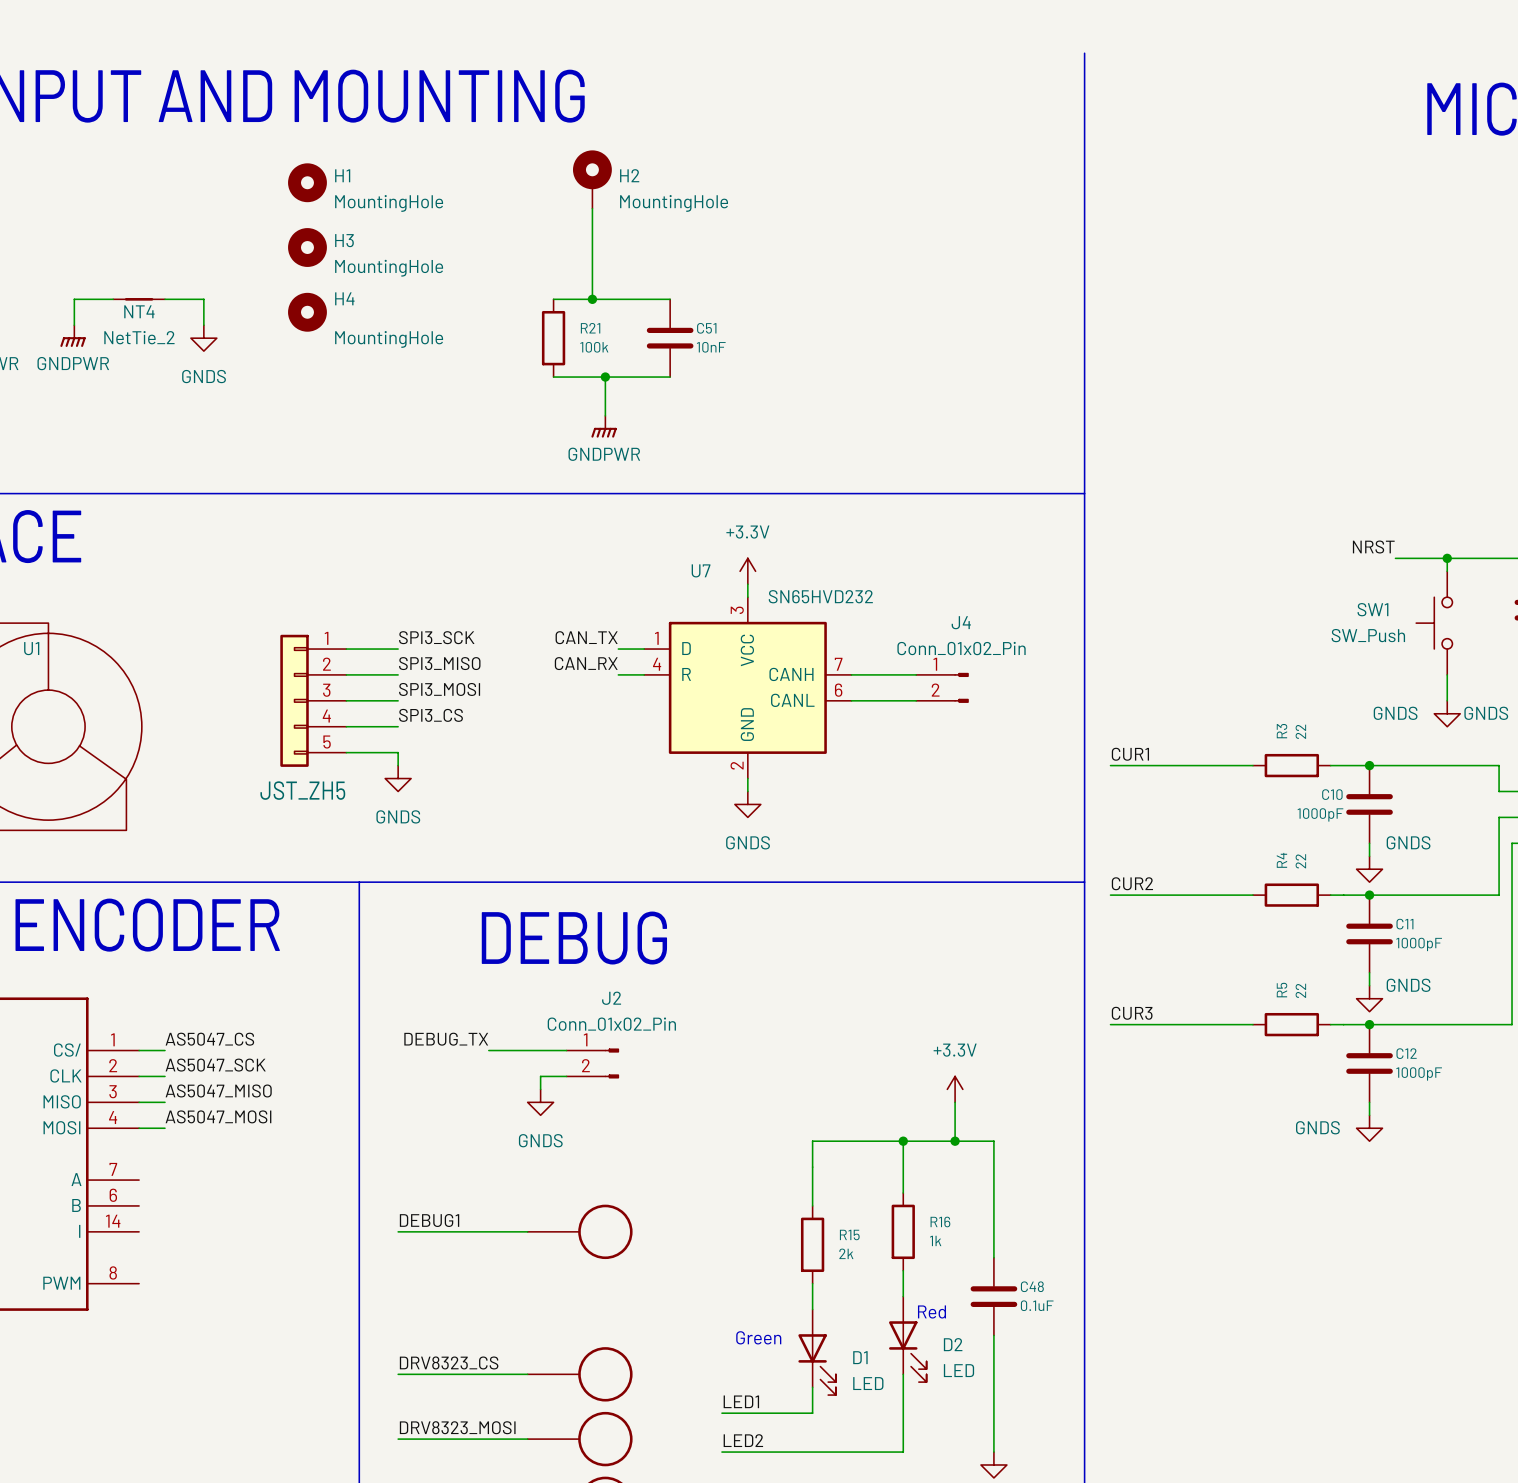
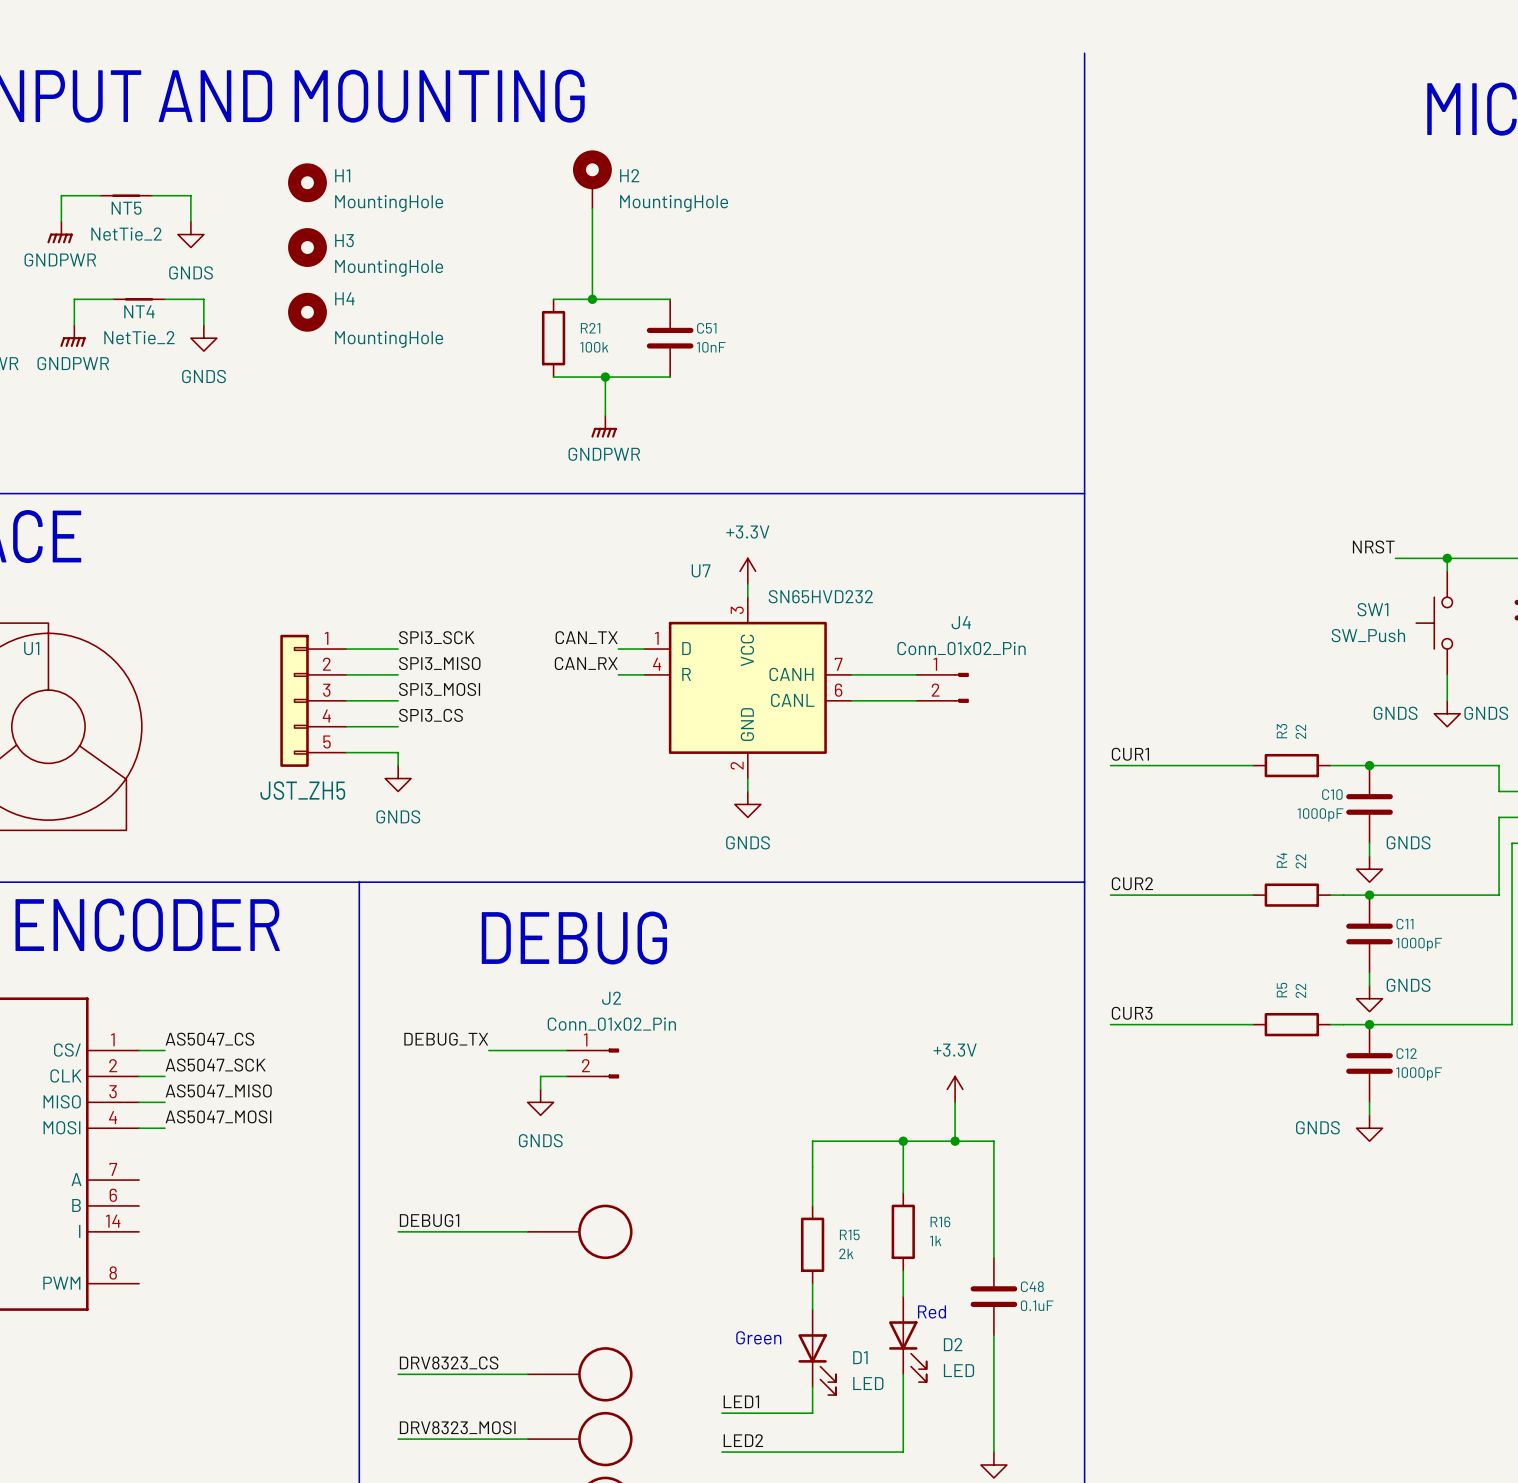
wire: none -> (100, 195) (61, 195) (61, 221)
NT5: none -> NetTie_2 (126, 195)
wire: none -> (152, 195) (190, 195) (190, 221)
power symbol: none -> GNDPWR (60, 232)
power symbol: none -> GNDS (190, 234)

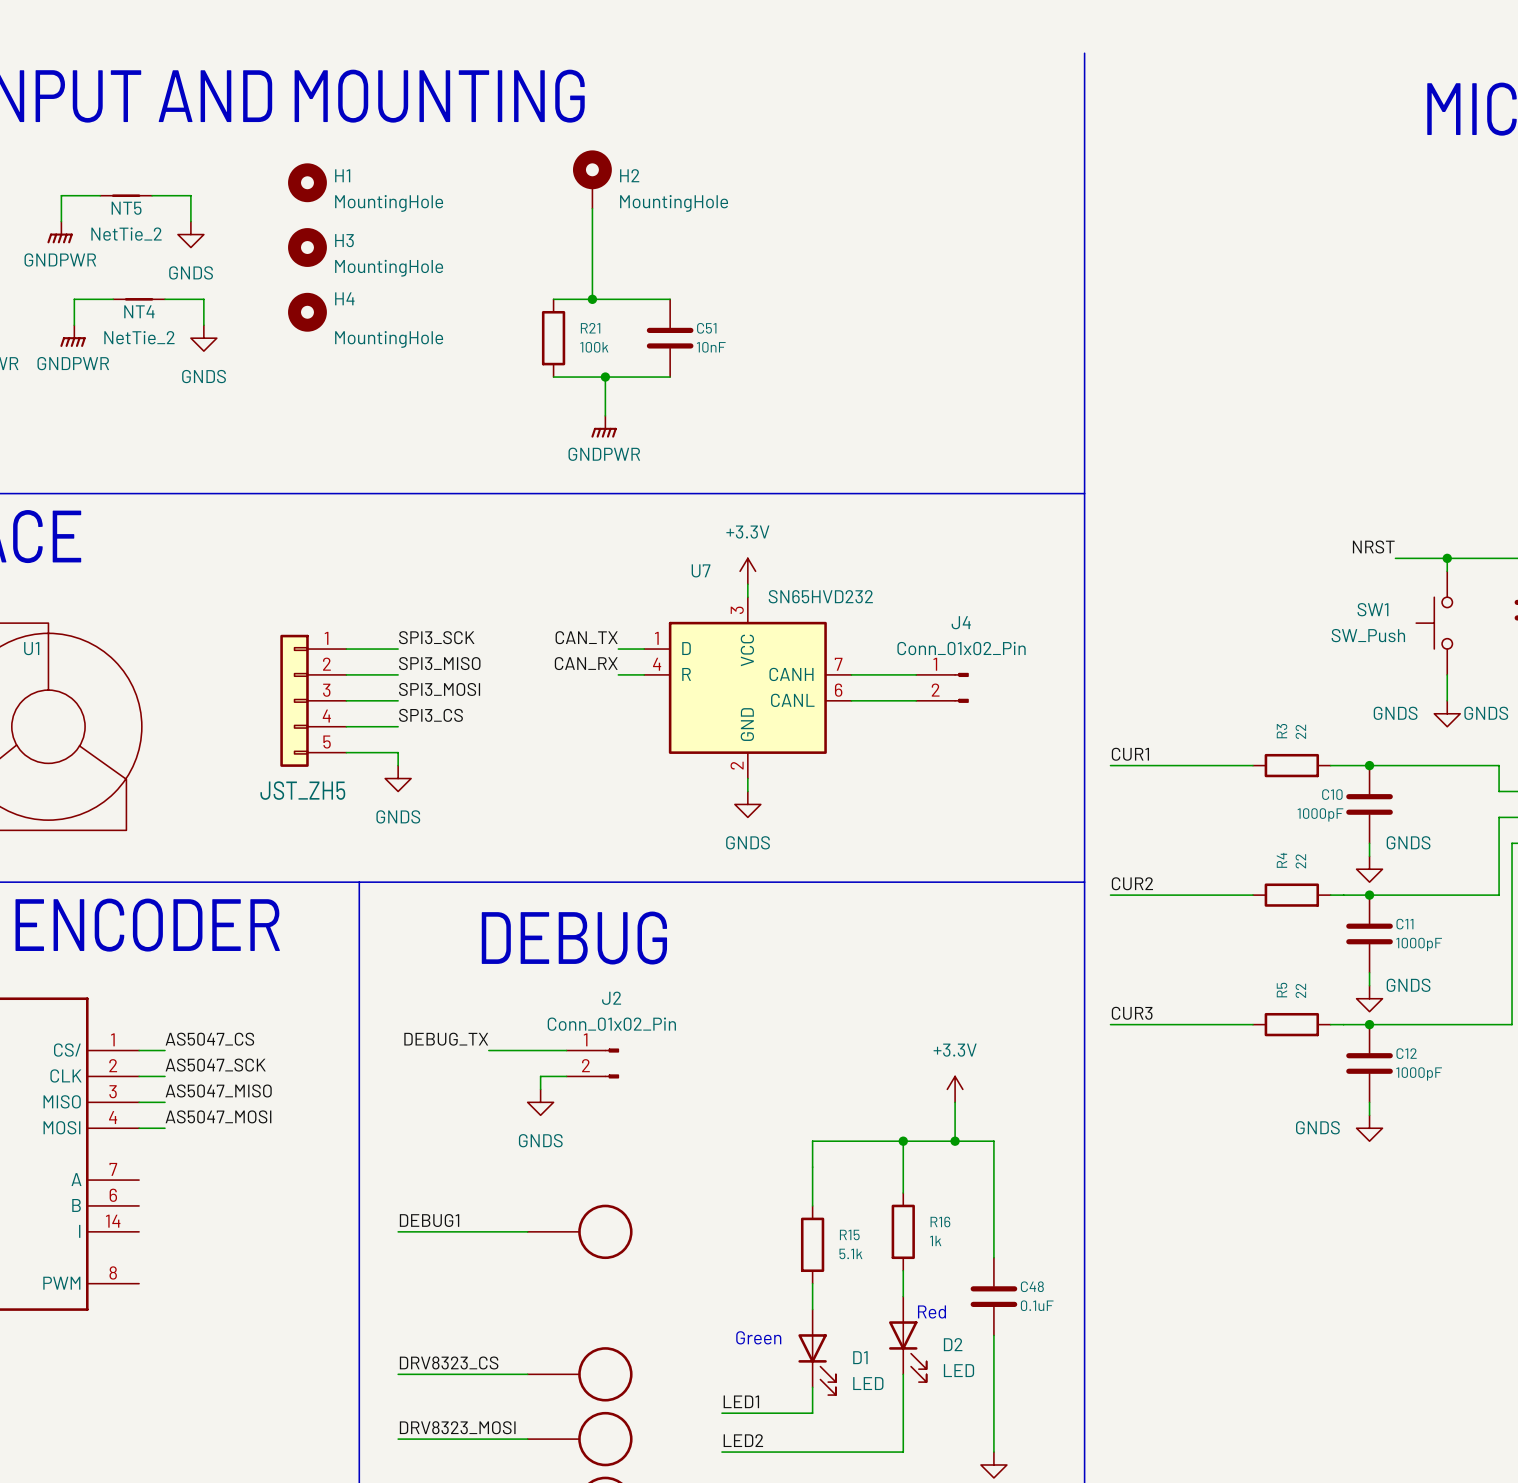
R15 value: 2k (846, 1253) -> 5.1k (850, 1253)

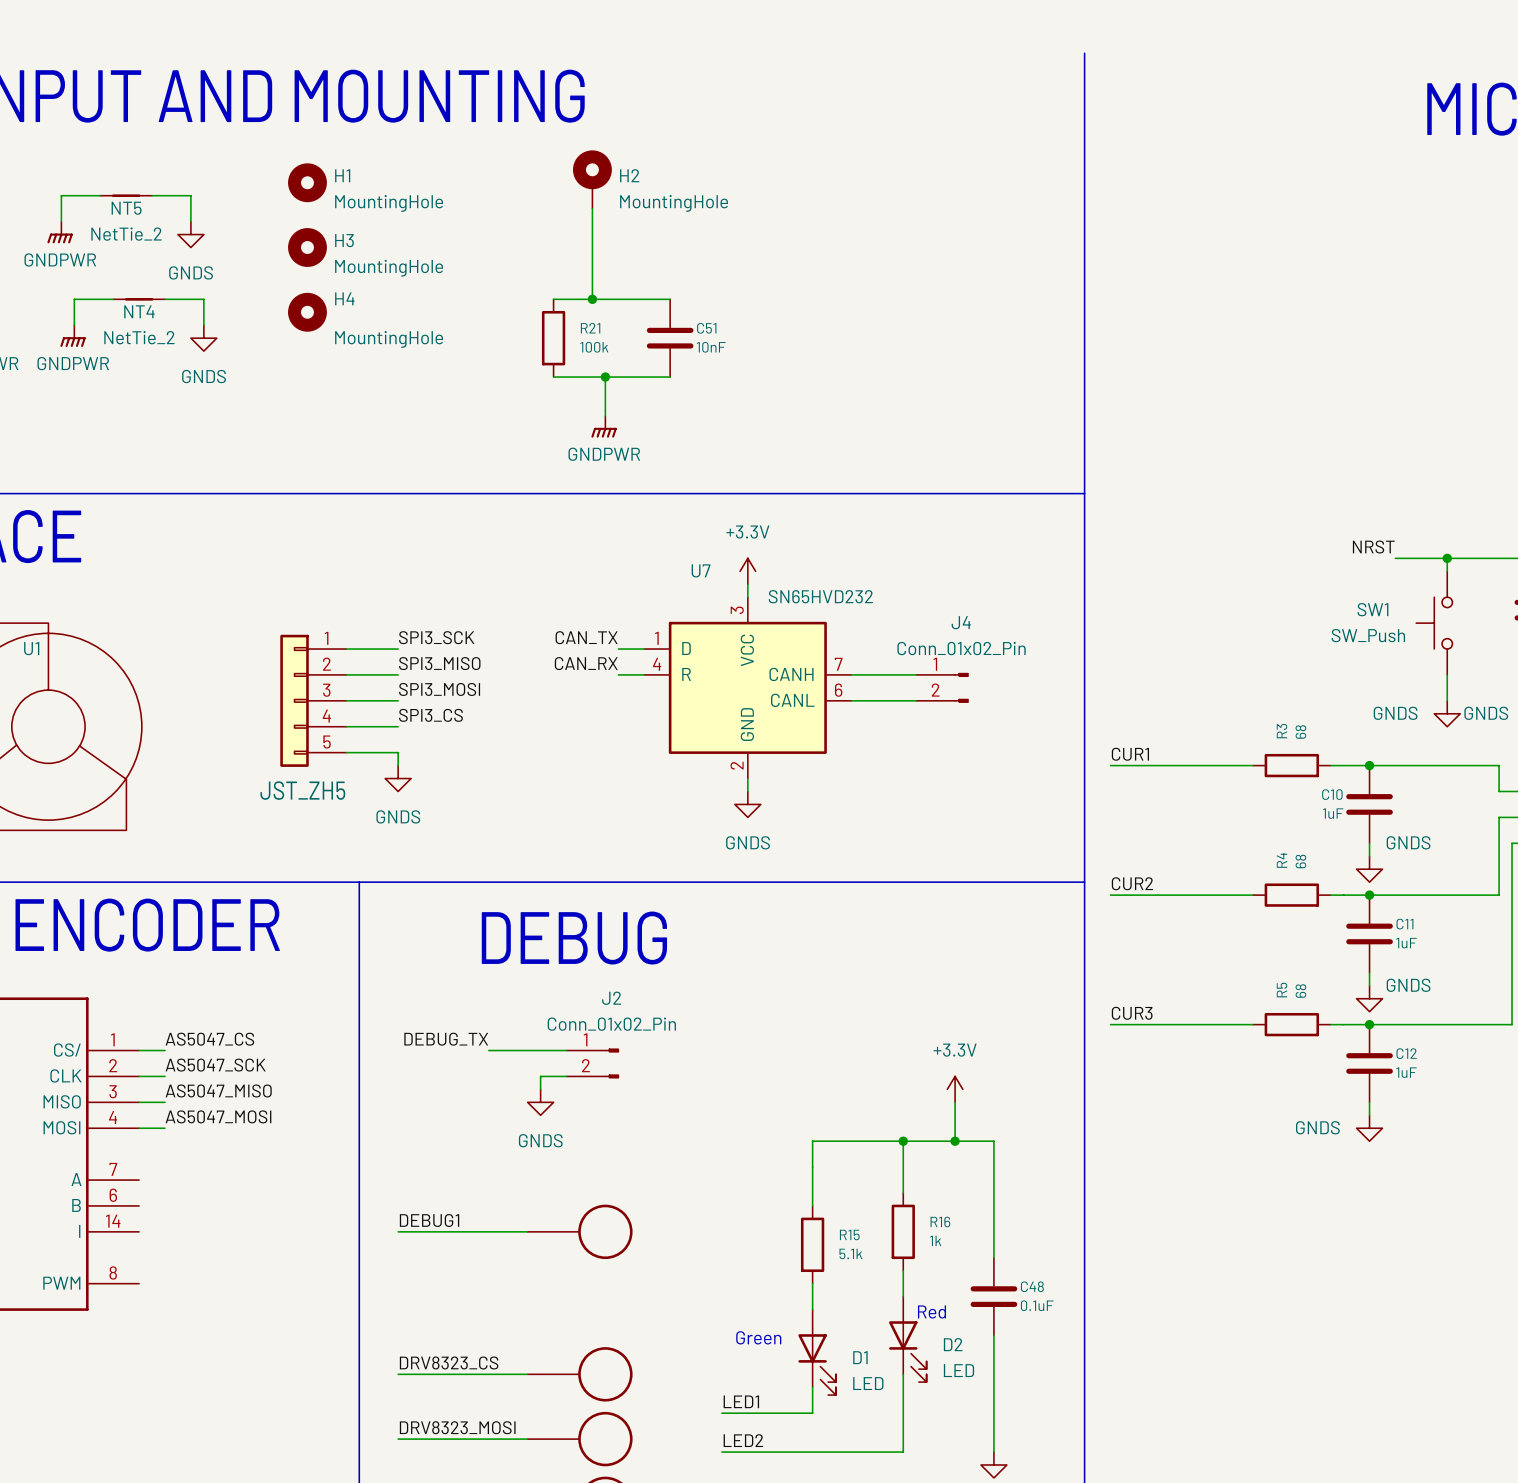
R3 value: 22 (1300, 731) -> 68 (1300, 731)
C10 value: 1000pF (1320, 814) -> 1uF (1333, 813)
R4 value: 22 (1300, 861) -> 68 (1300, 861)
C11 value: 1000pF (1419, 944) -> 1uF (1406, 943)
R5 value: 22 (1300, 990) -> 68 (1300, 991)
C12 value: 1000pF (1419, 1073) -> 1uF (1406, 1072)

